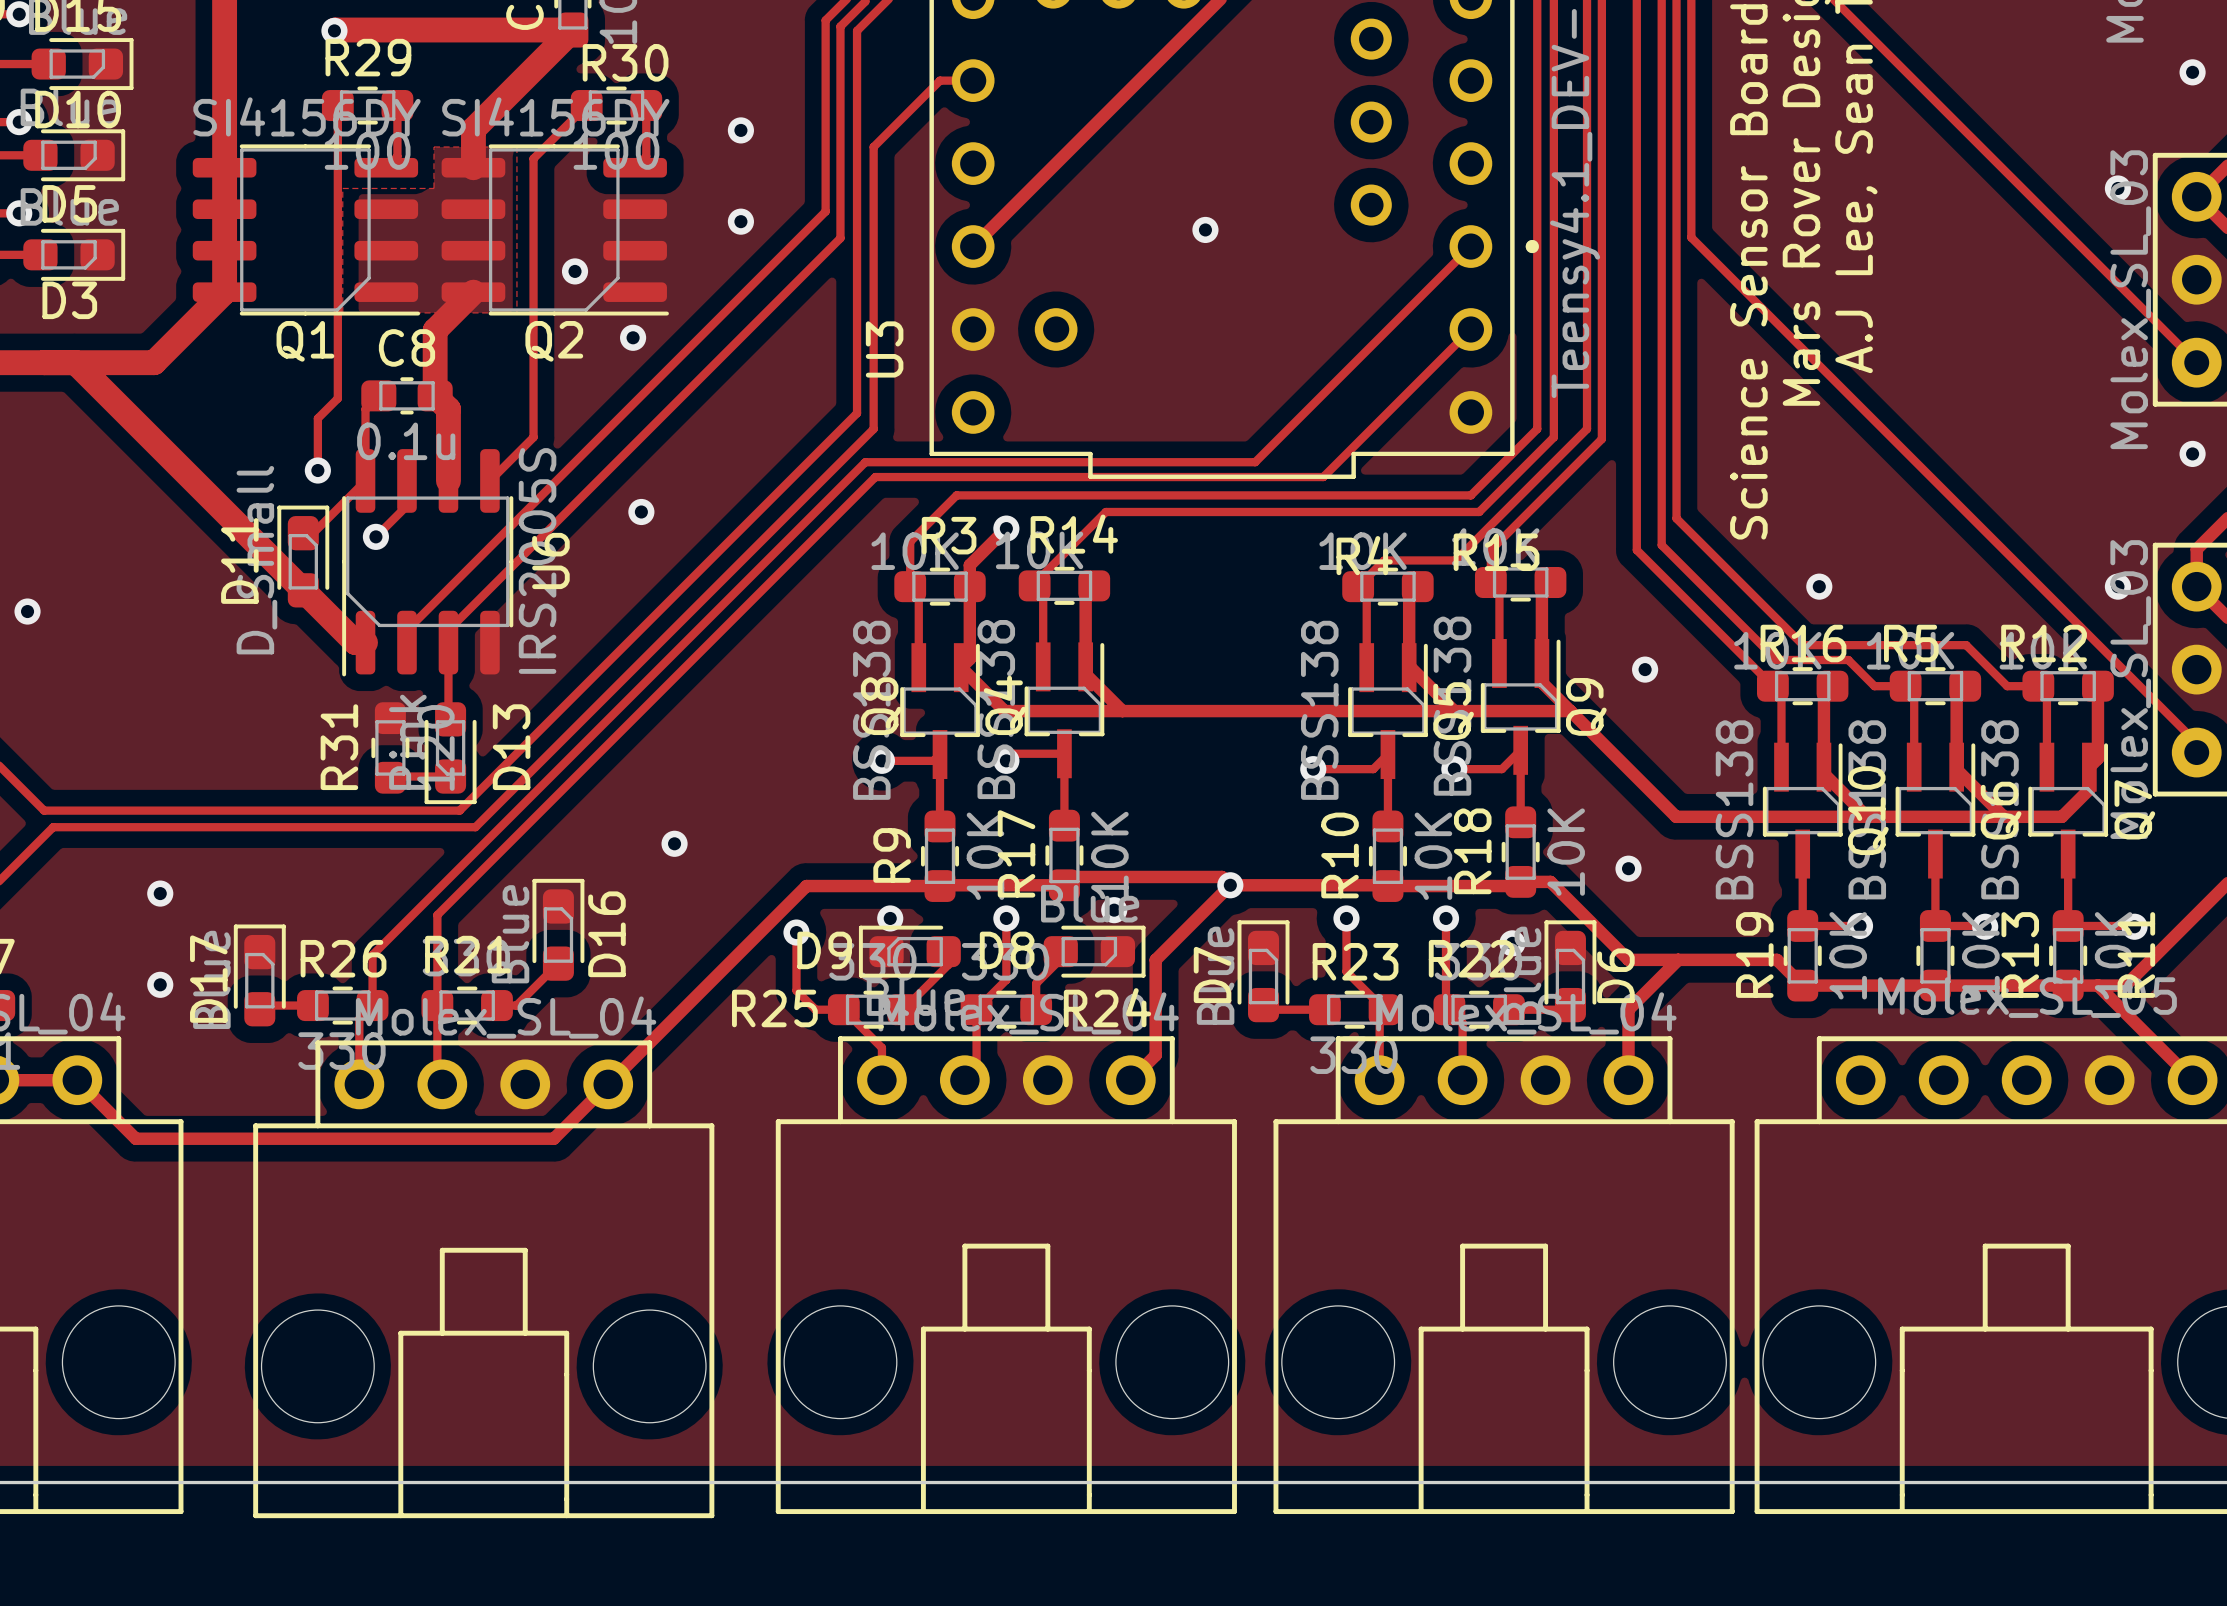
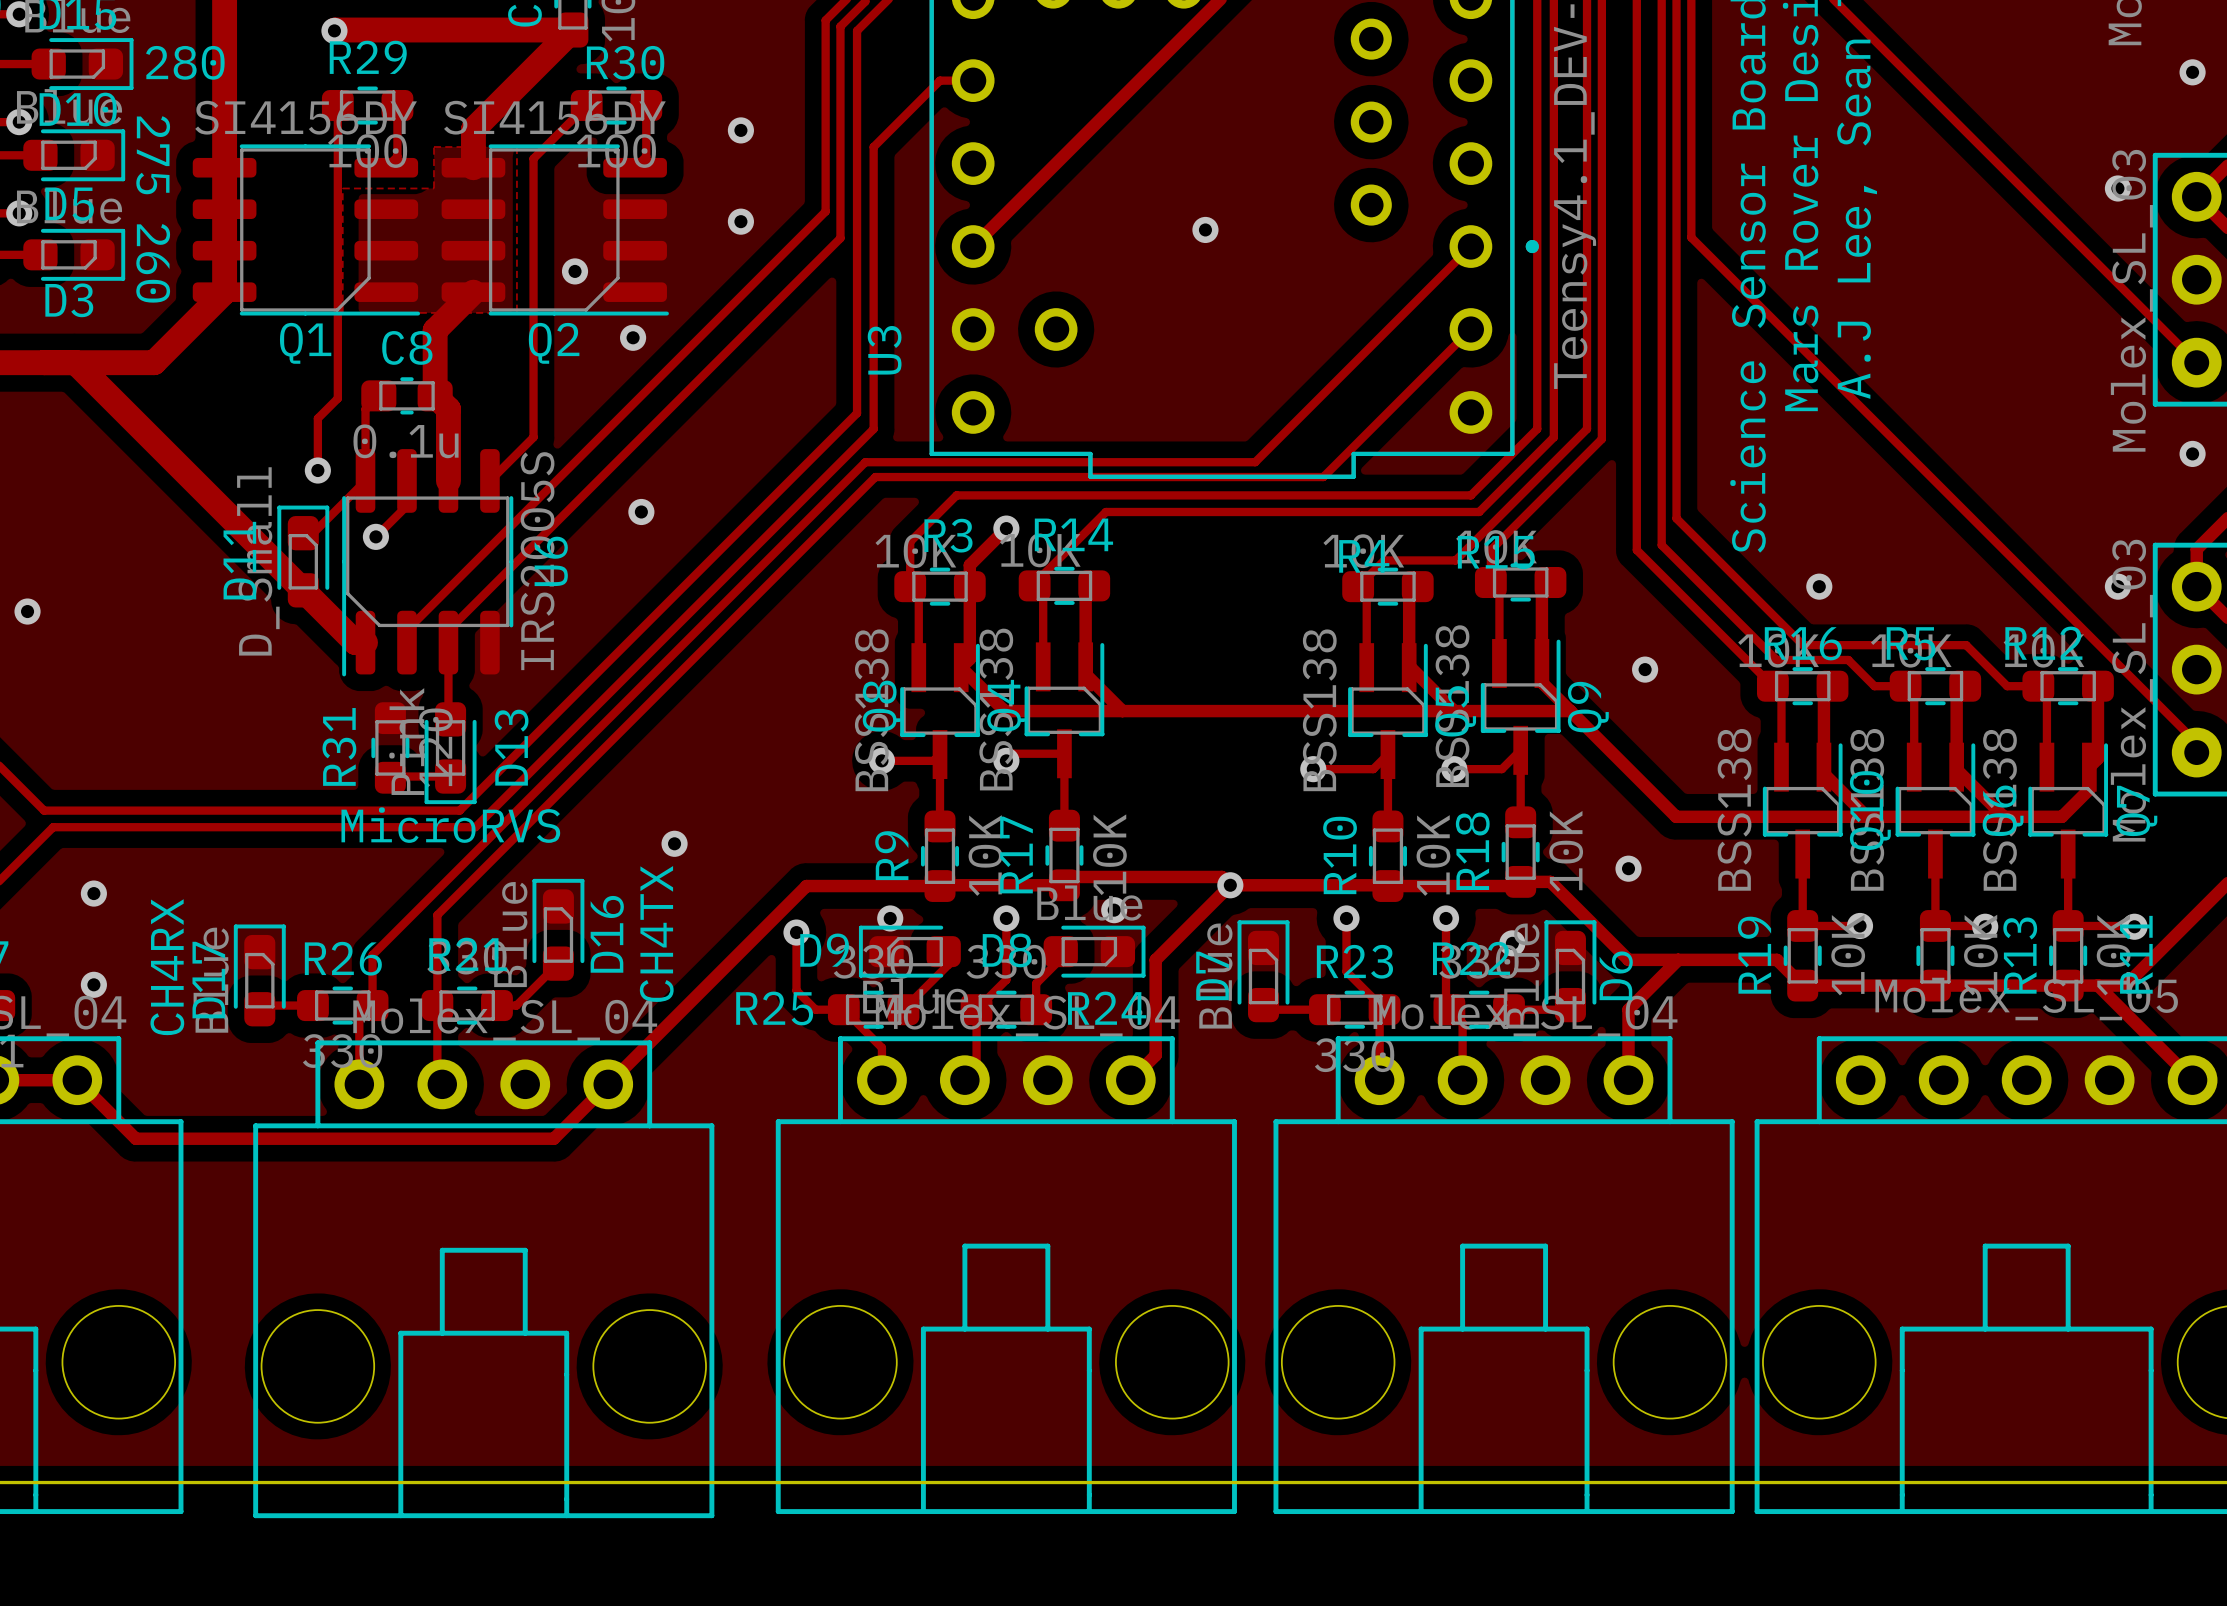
text: none -> 280 (185, 62)
text: none -> 275 (153, 155)
text: none -> 260 (153, 263)
text: none -> MicroRVS (450, 825)
via: none -> (93, 893)
via: (160, 893) -> none
text: none -> CH4TX (656, 933)
text: none -> CH4RX (167, 967)
via: none -> (93, 984)
via: (160, 984) -> none

